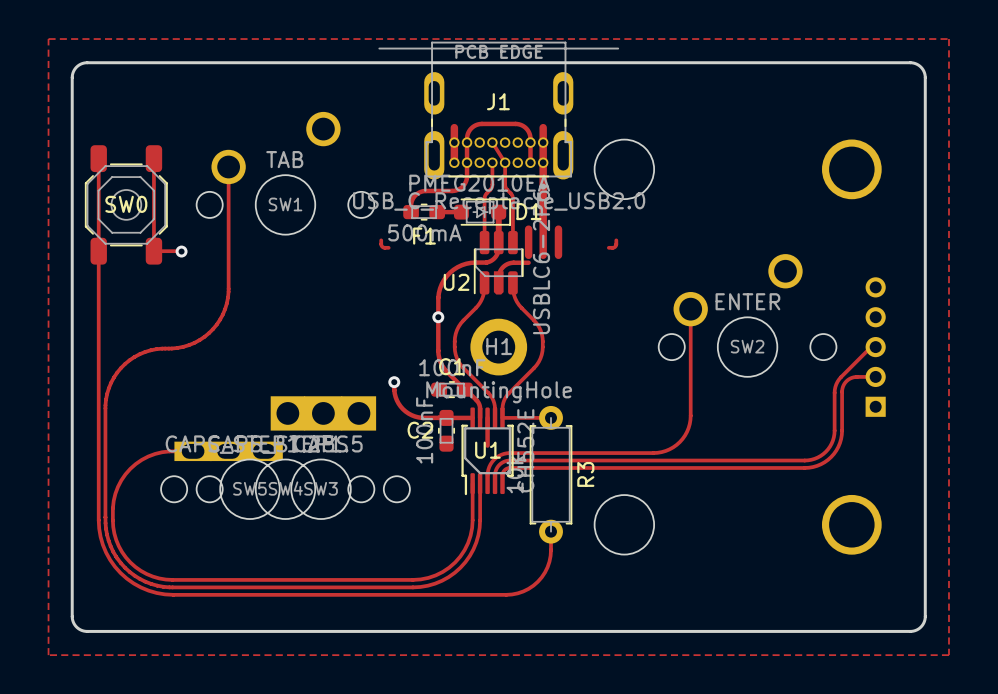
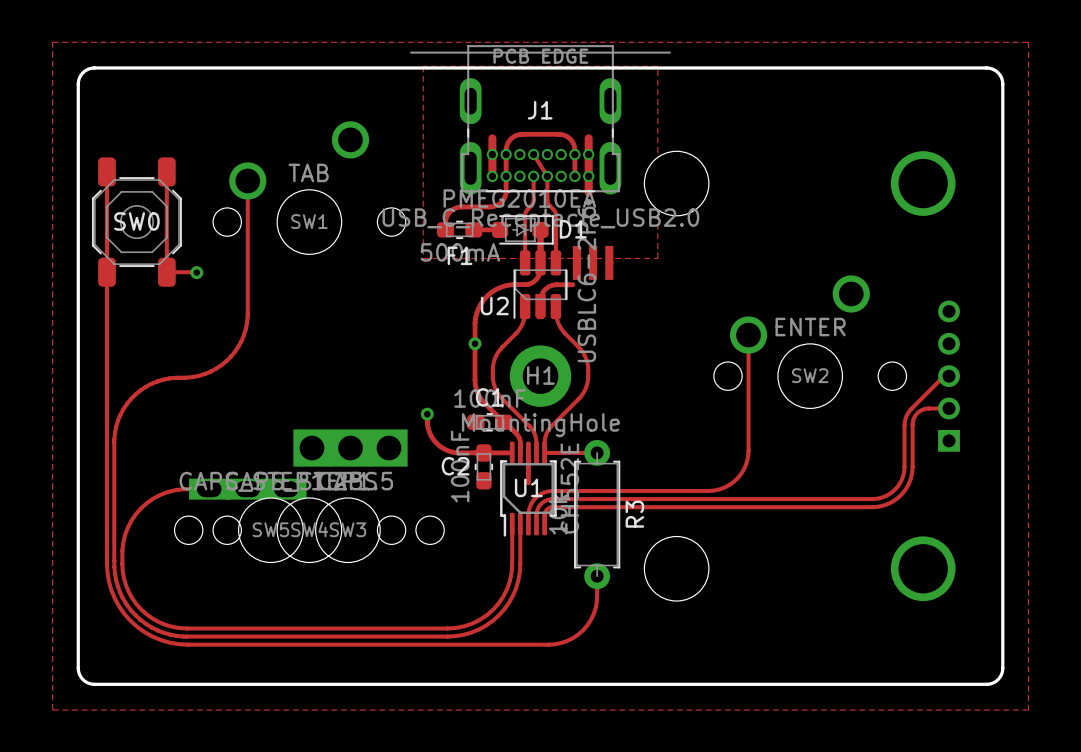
zone outline: none -> (423, 66) (423, 258) (657, 258) (657, 66) (423, 66)
track: (543, 177) (543, 255) -> none
track: (528, 229) (528, 255) -> none
track: (558, 229) (558, 255) -> none
track: (381, 240) (382, 246) (388, 247) -> none
track: (616, 240) (615, 246) (608, 247) -> none
part: none -> (593, 262)

